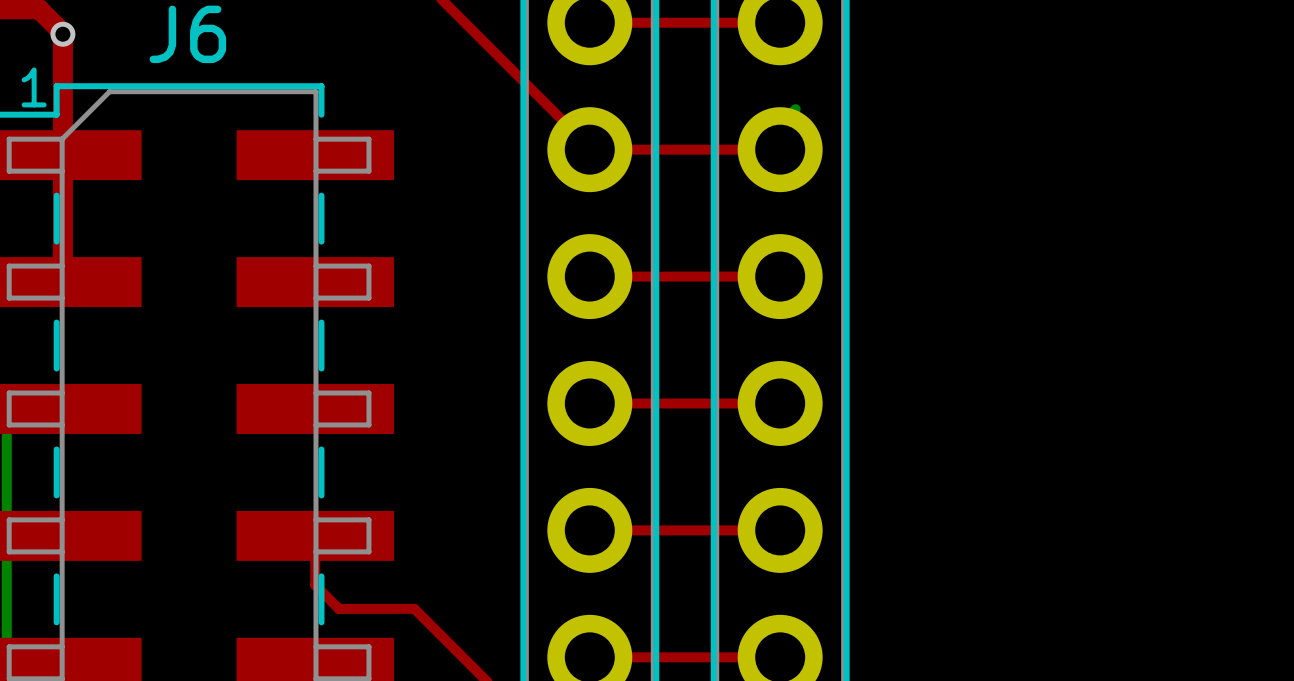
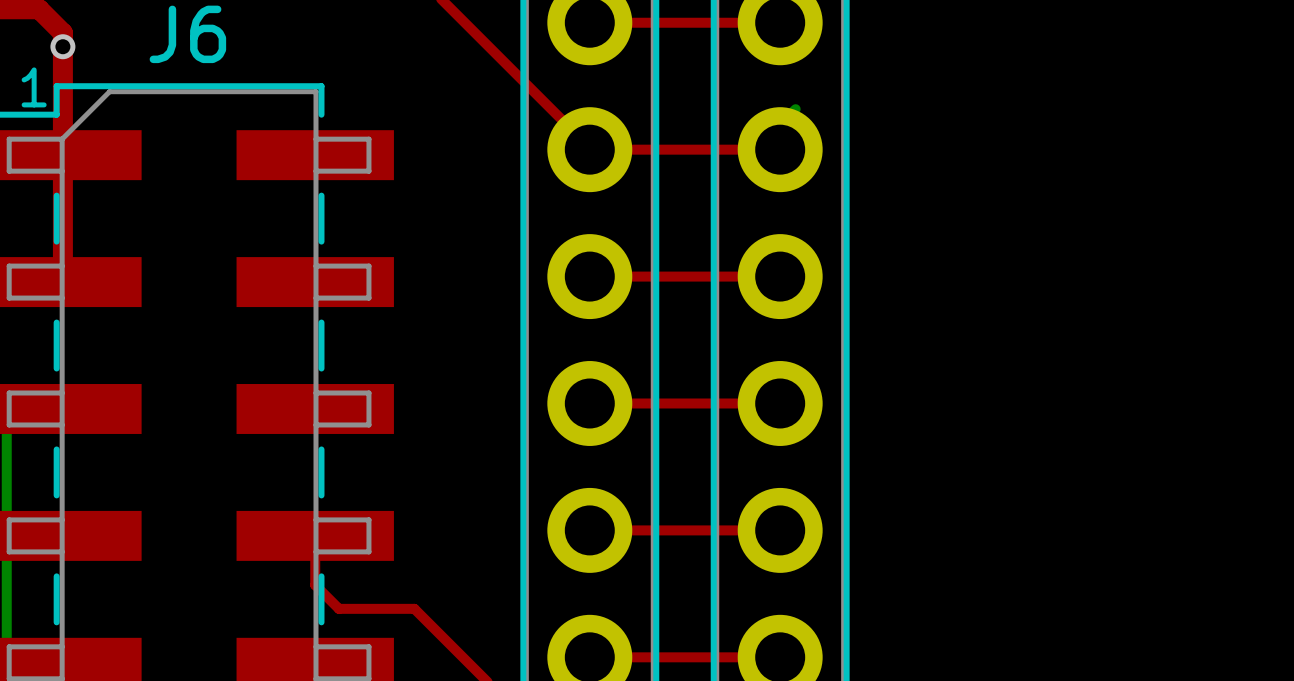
via position: (62, 34) -> (62, 46)

